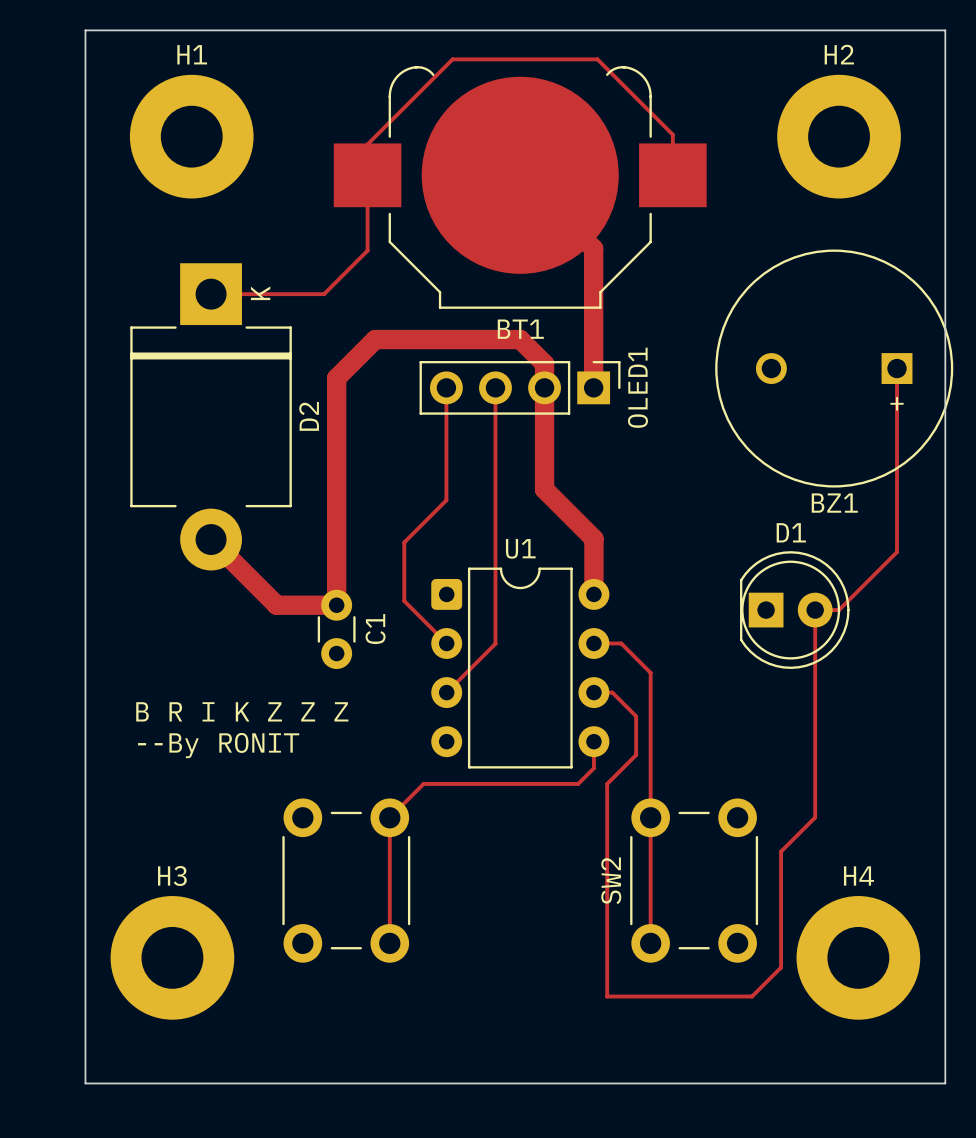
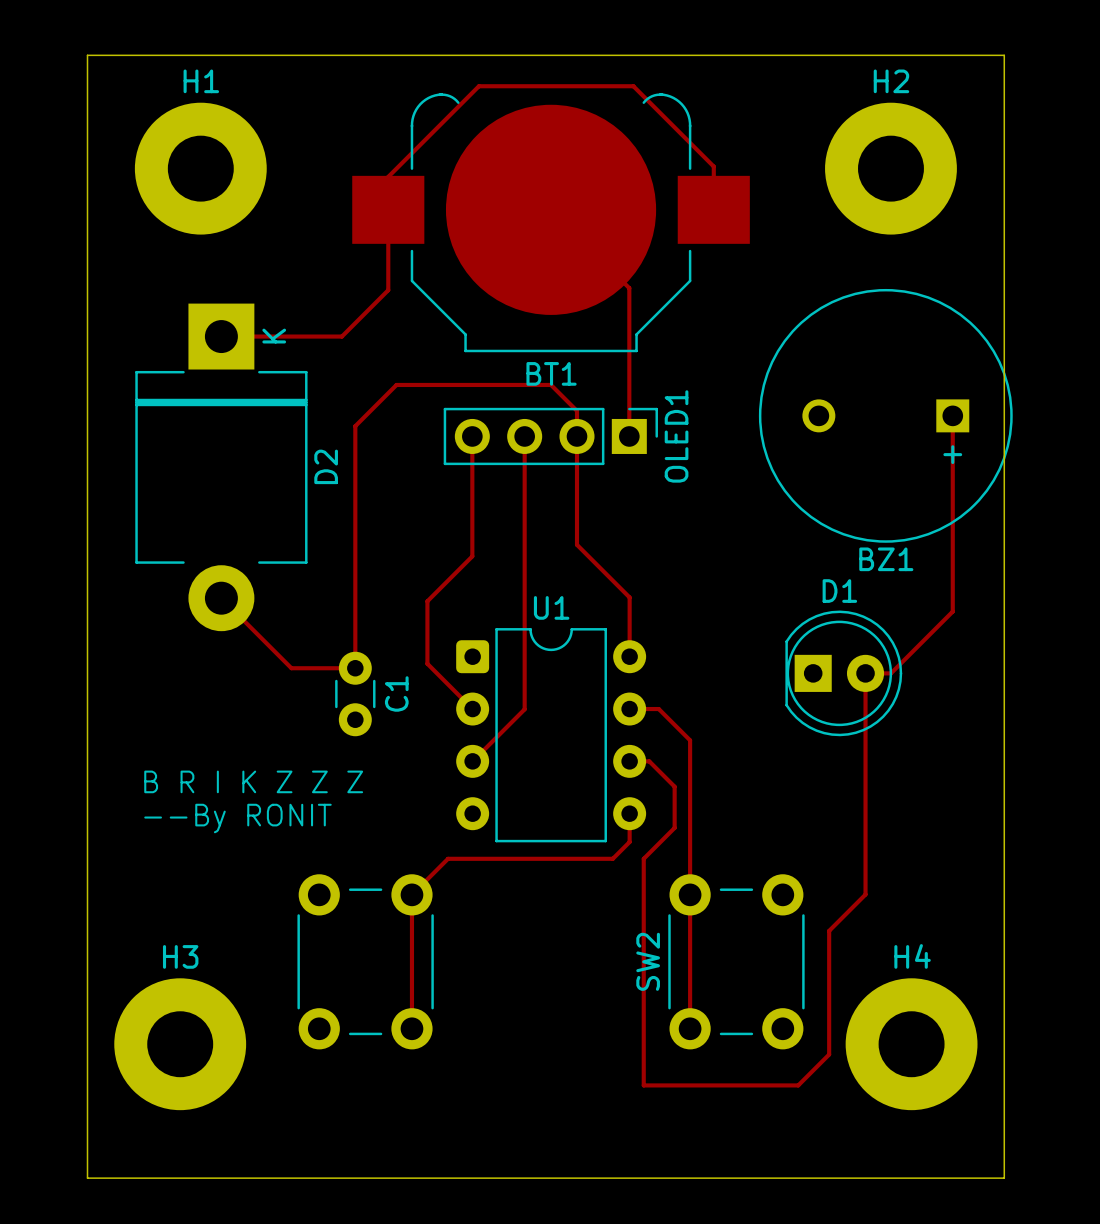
top track width: thick (520, 175) (593, 248) (593, 387) -> thin (551, 209) (629, 288) (629, 436)
top track width: thick (211, 539) (276, 605) (336, 605) (336, 378) (375, 339) (520, 339) (544, 363) (544, 489) (593, 538) (593, 594) -> thin (221, 598) (291, 668) (355, 668) (355, 426) (396, 384) (551, 384) (577, 410) (577, 544) (629, 597) (629, 656)

